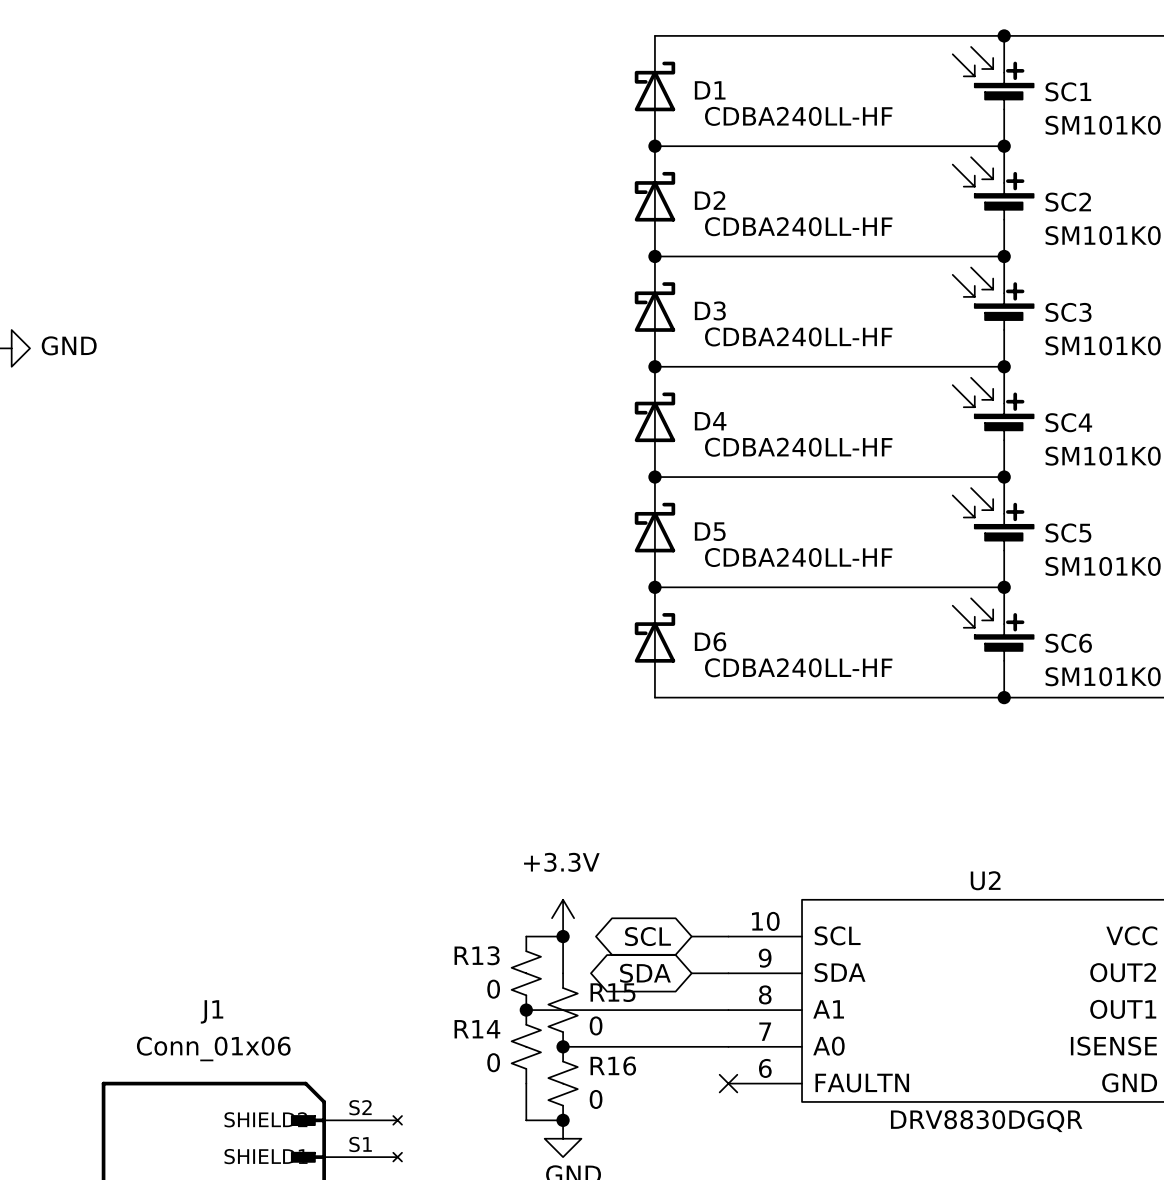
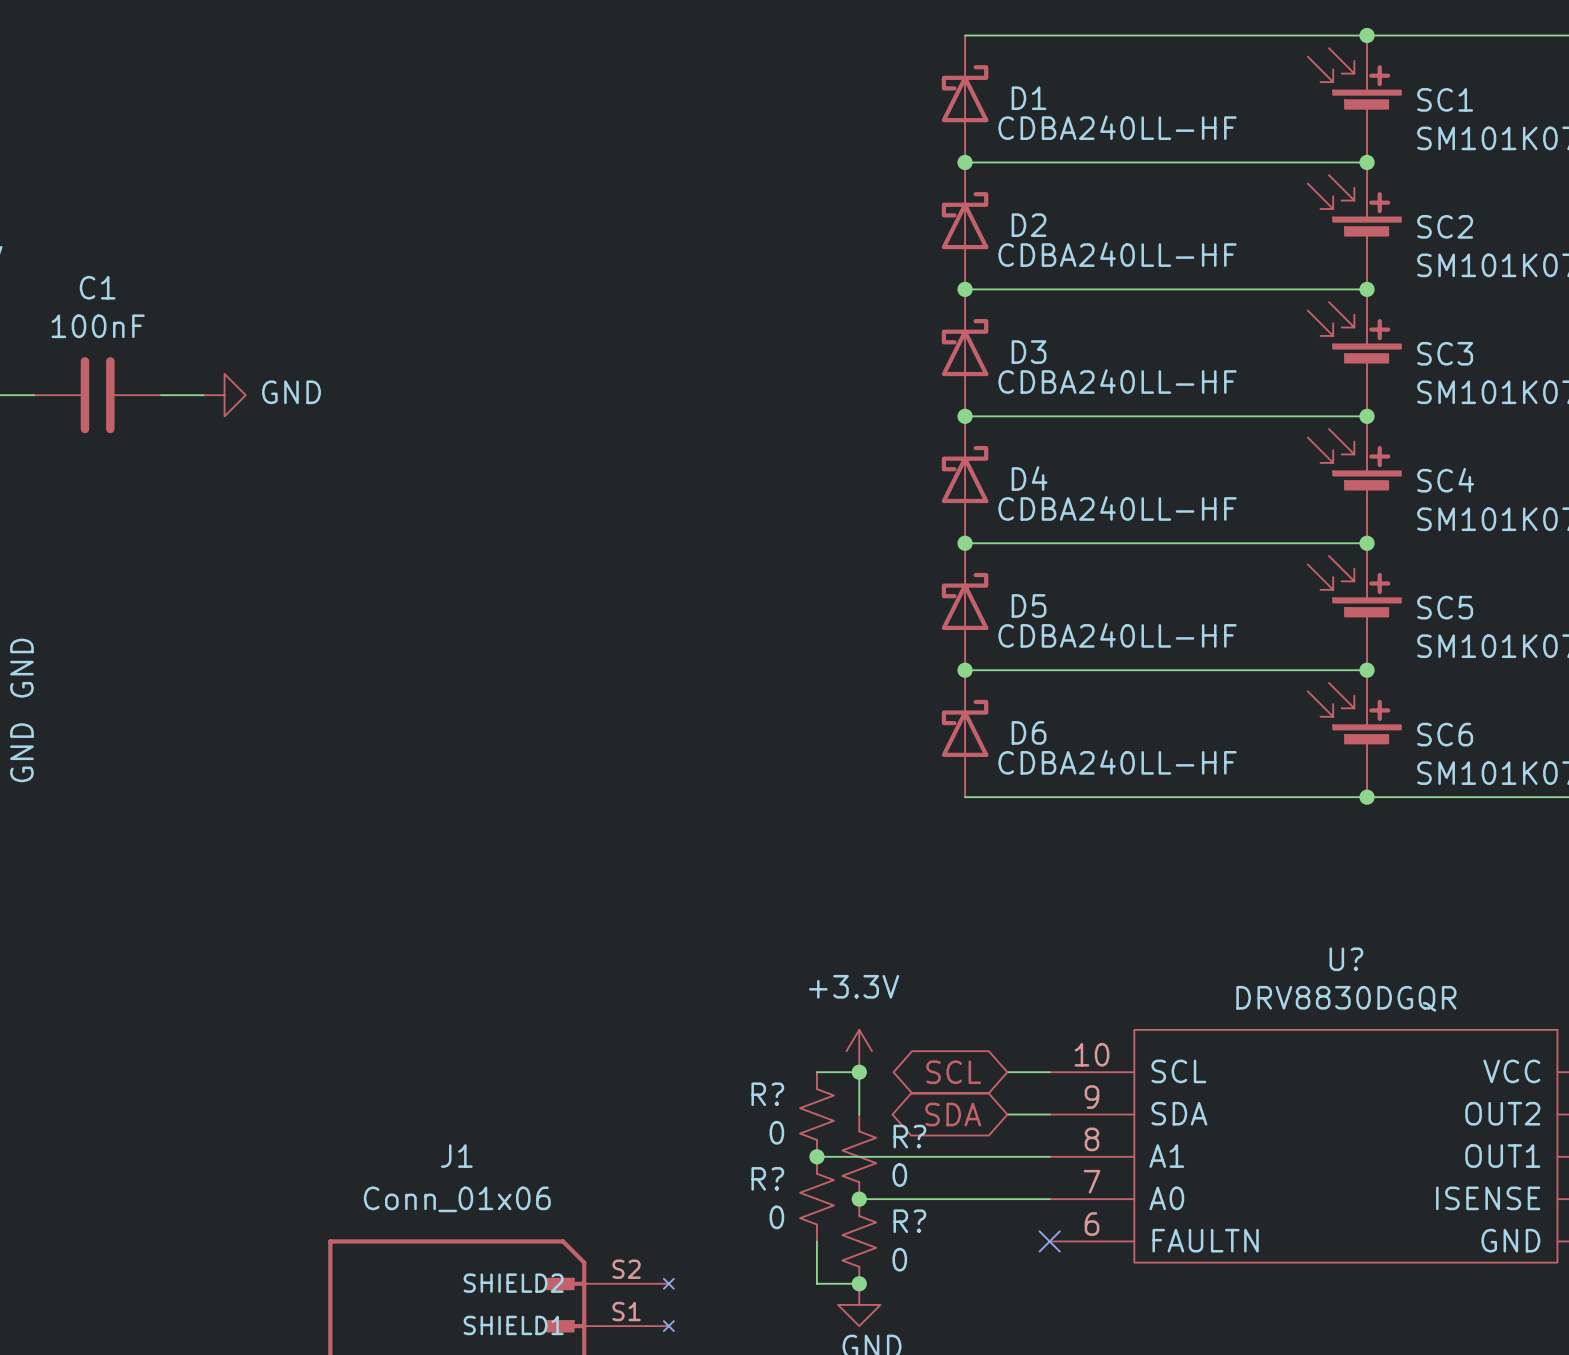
U2 name: U2 (985, 880) -> U? (1346, 959)
R13 name: R13 (477, 955) -> R? (767, 1094)
R15 name: R15 (613, 992) -> R? (909, 1136)
R14 name: R14 (477, 1029) -> R? (767, 1178)
R16 name: R16 (613, 1066) -> R? (909, 1221)
U2 value position: DRV8830DGQR (986, 1121) -> DRV8830DGQR (1346, 998)

